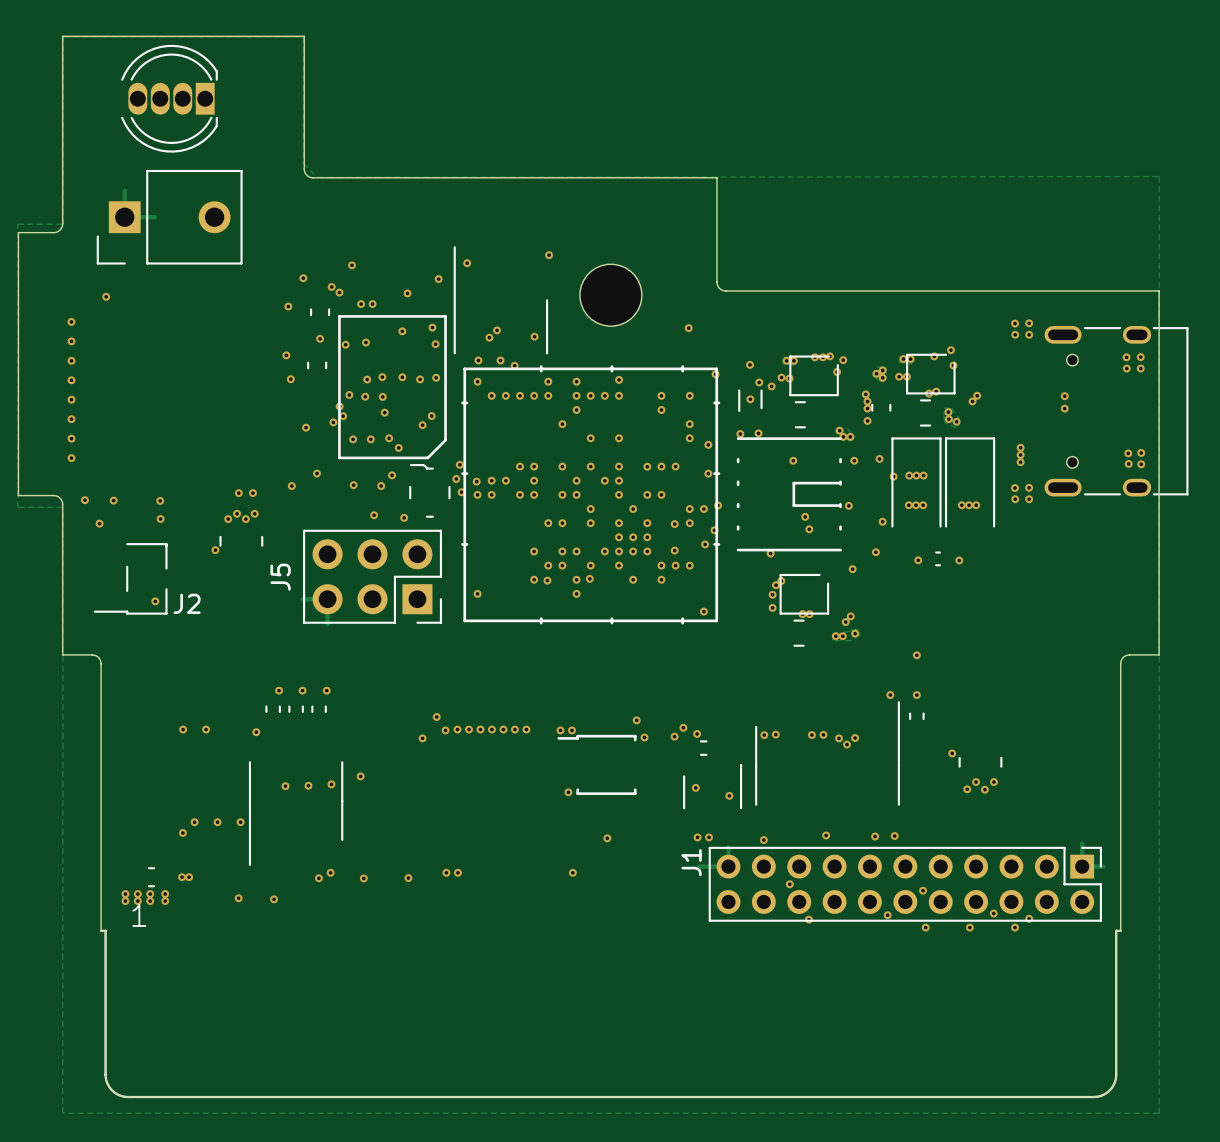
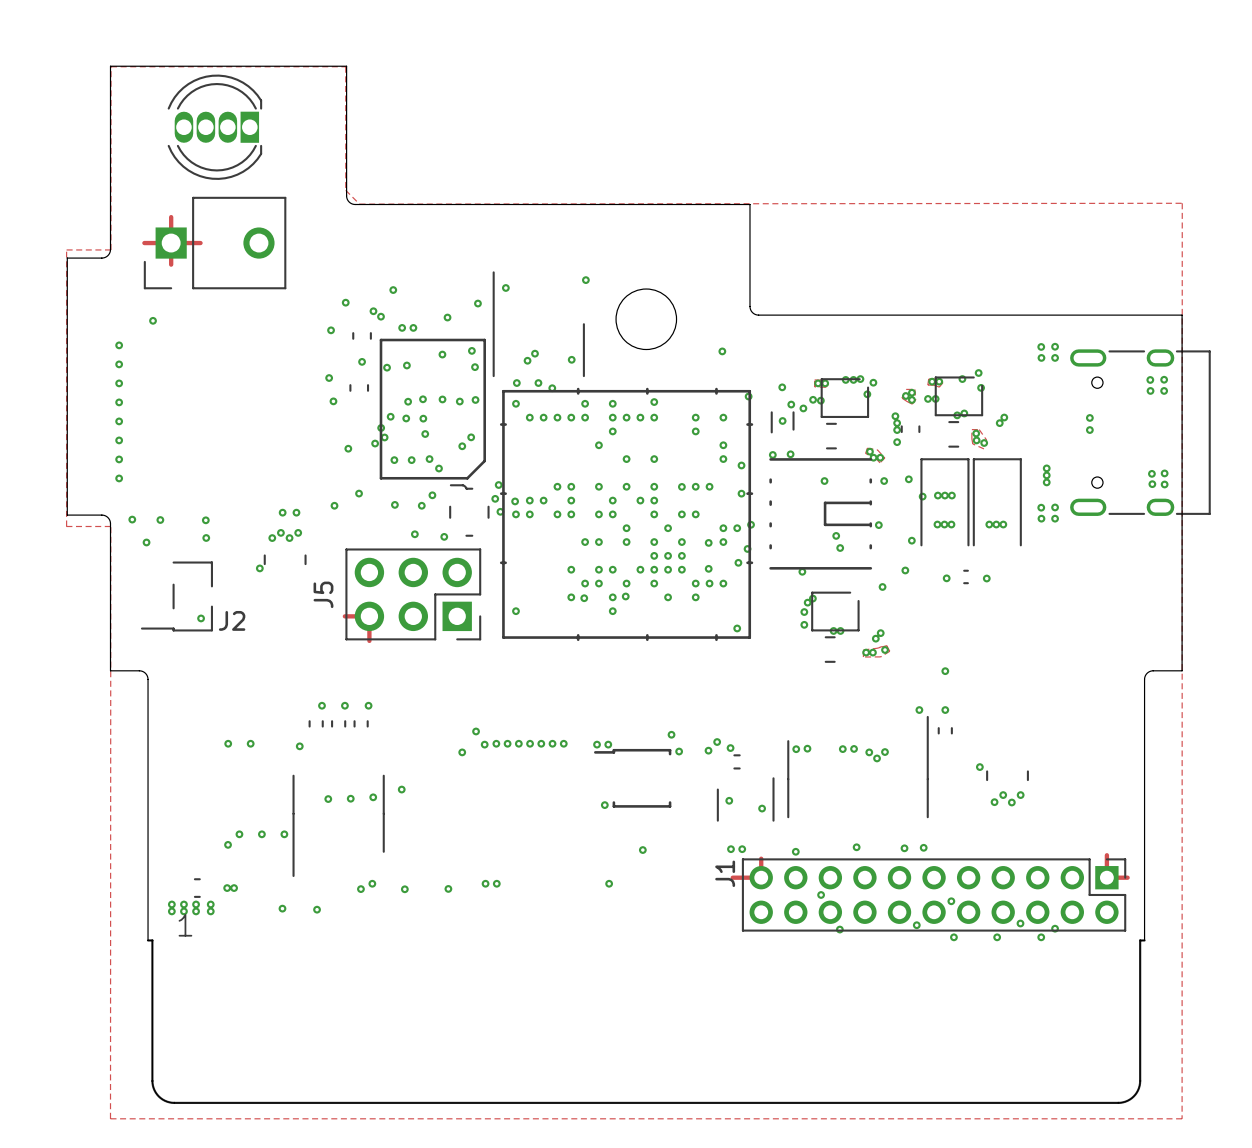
track: none -> (144, 243) (171, 243) (171, 264)

